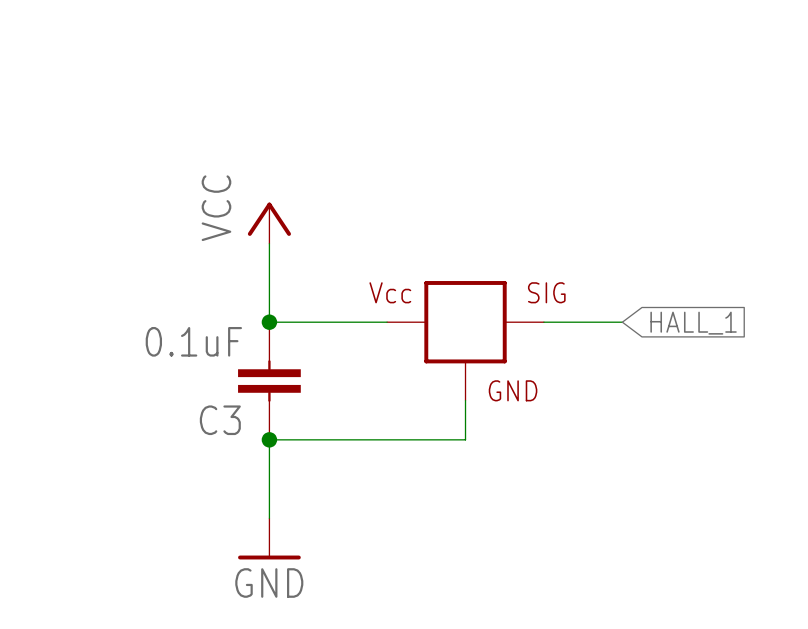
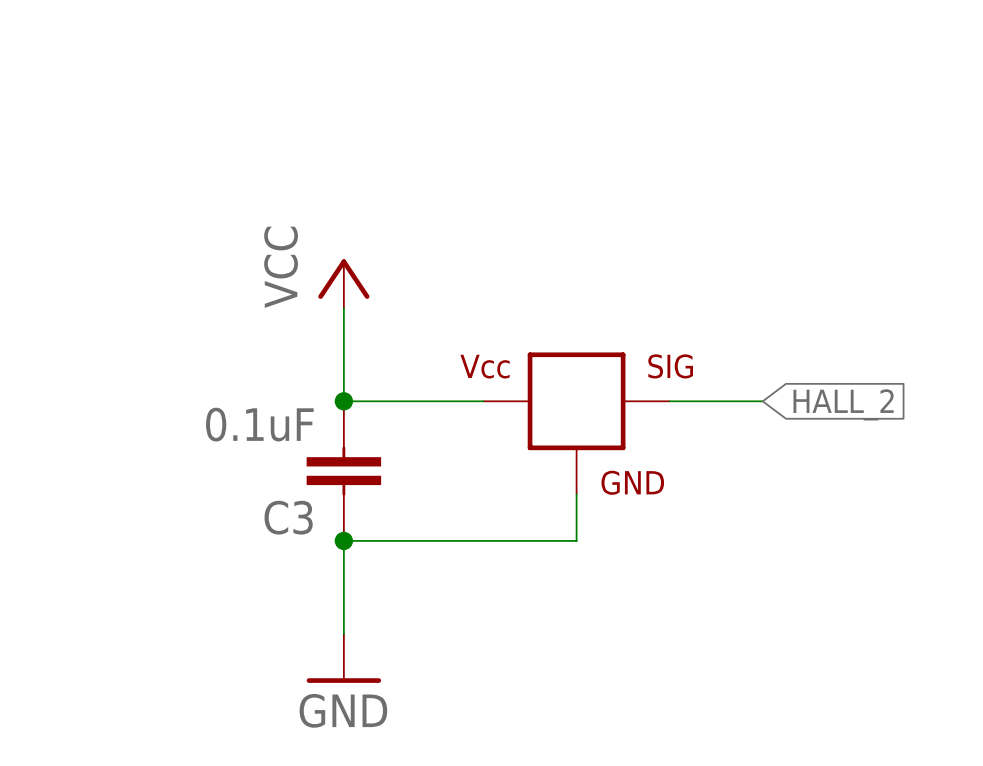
global label: HALL_1 (693, 323) -> HALL_2 (843, 404)

